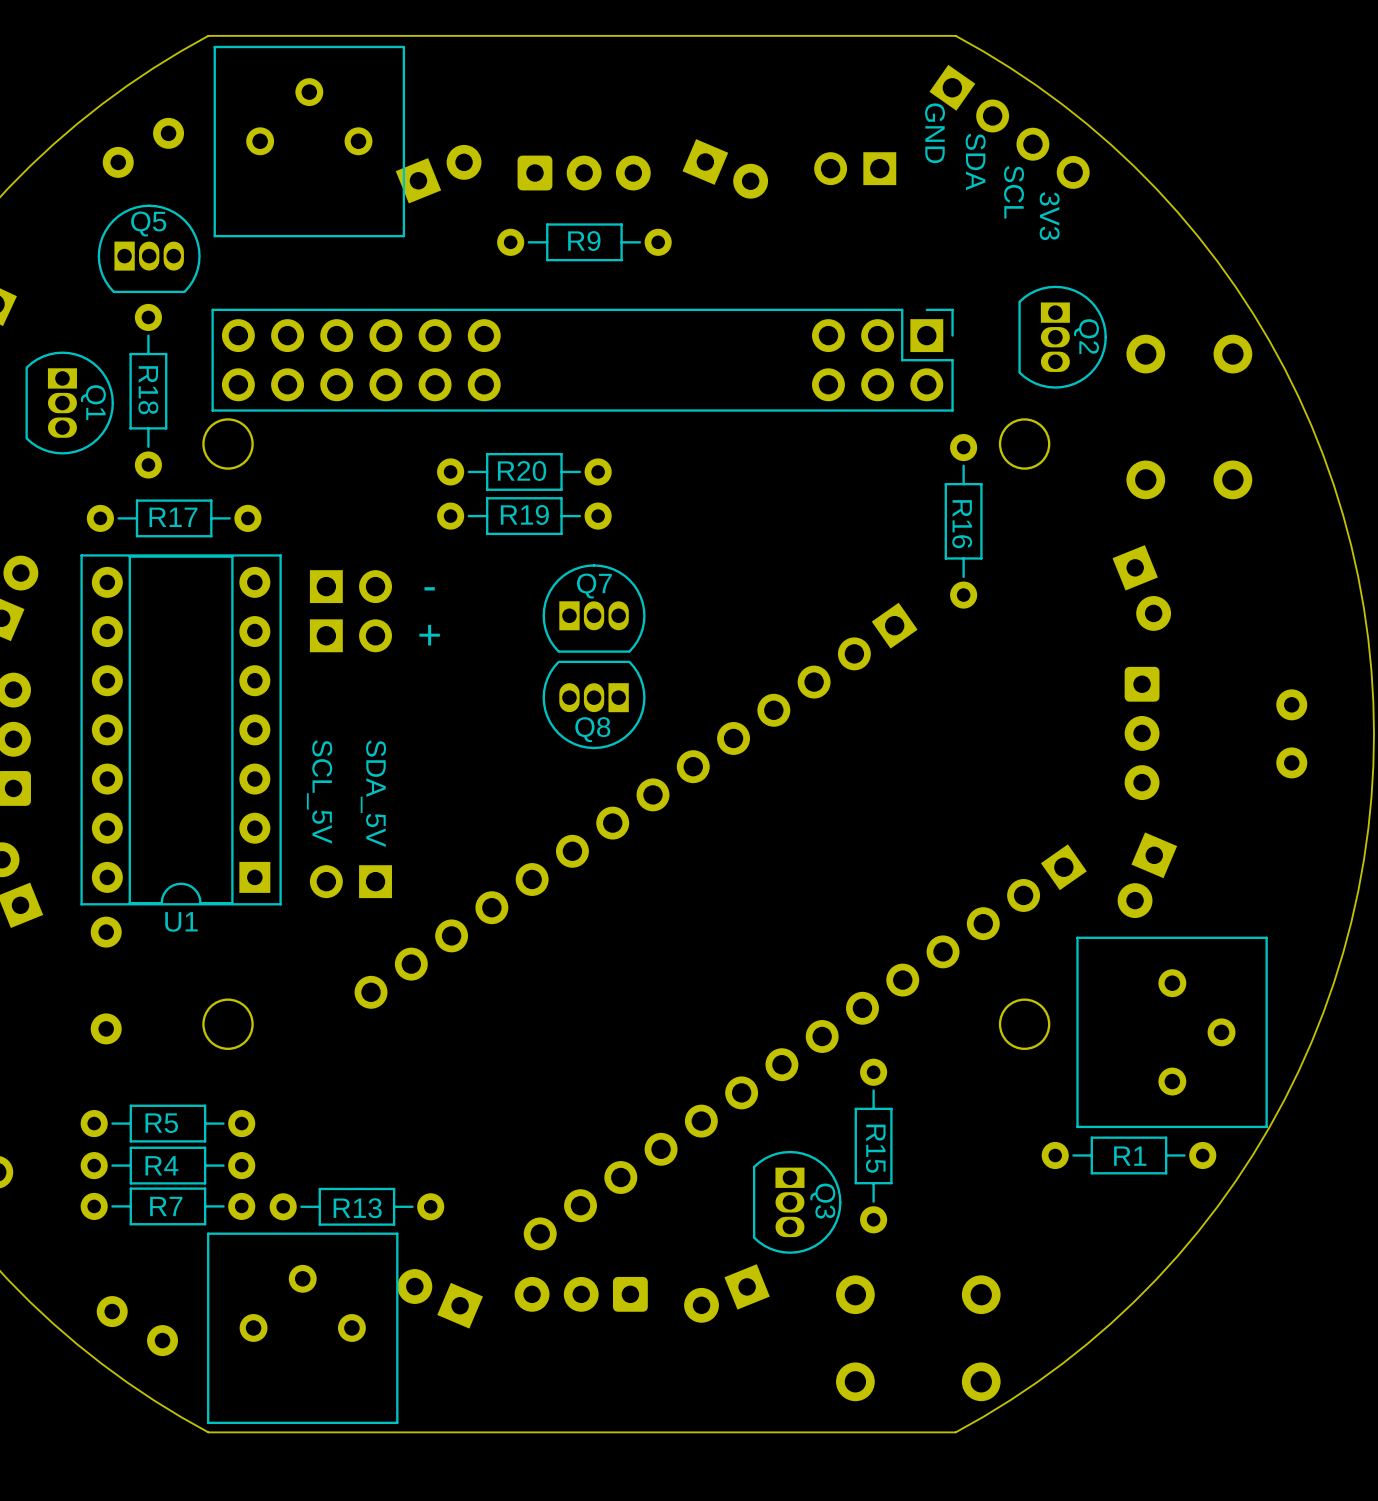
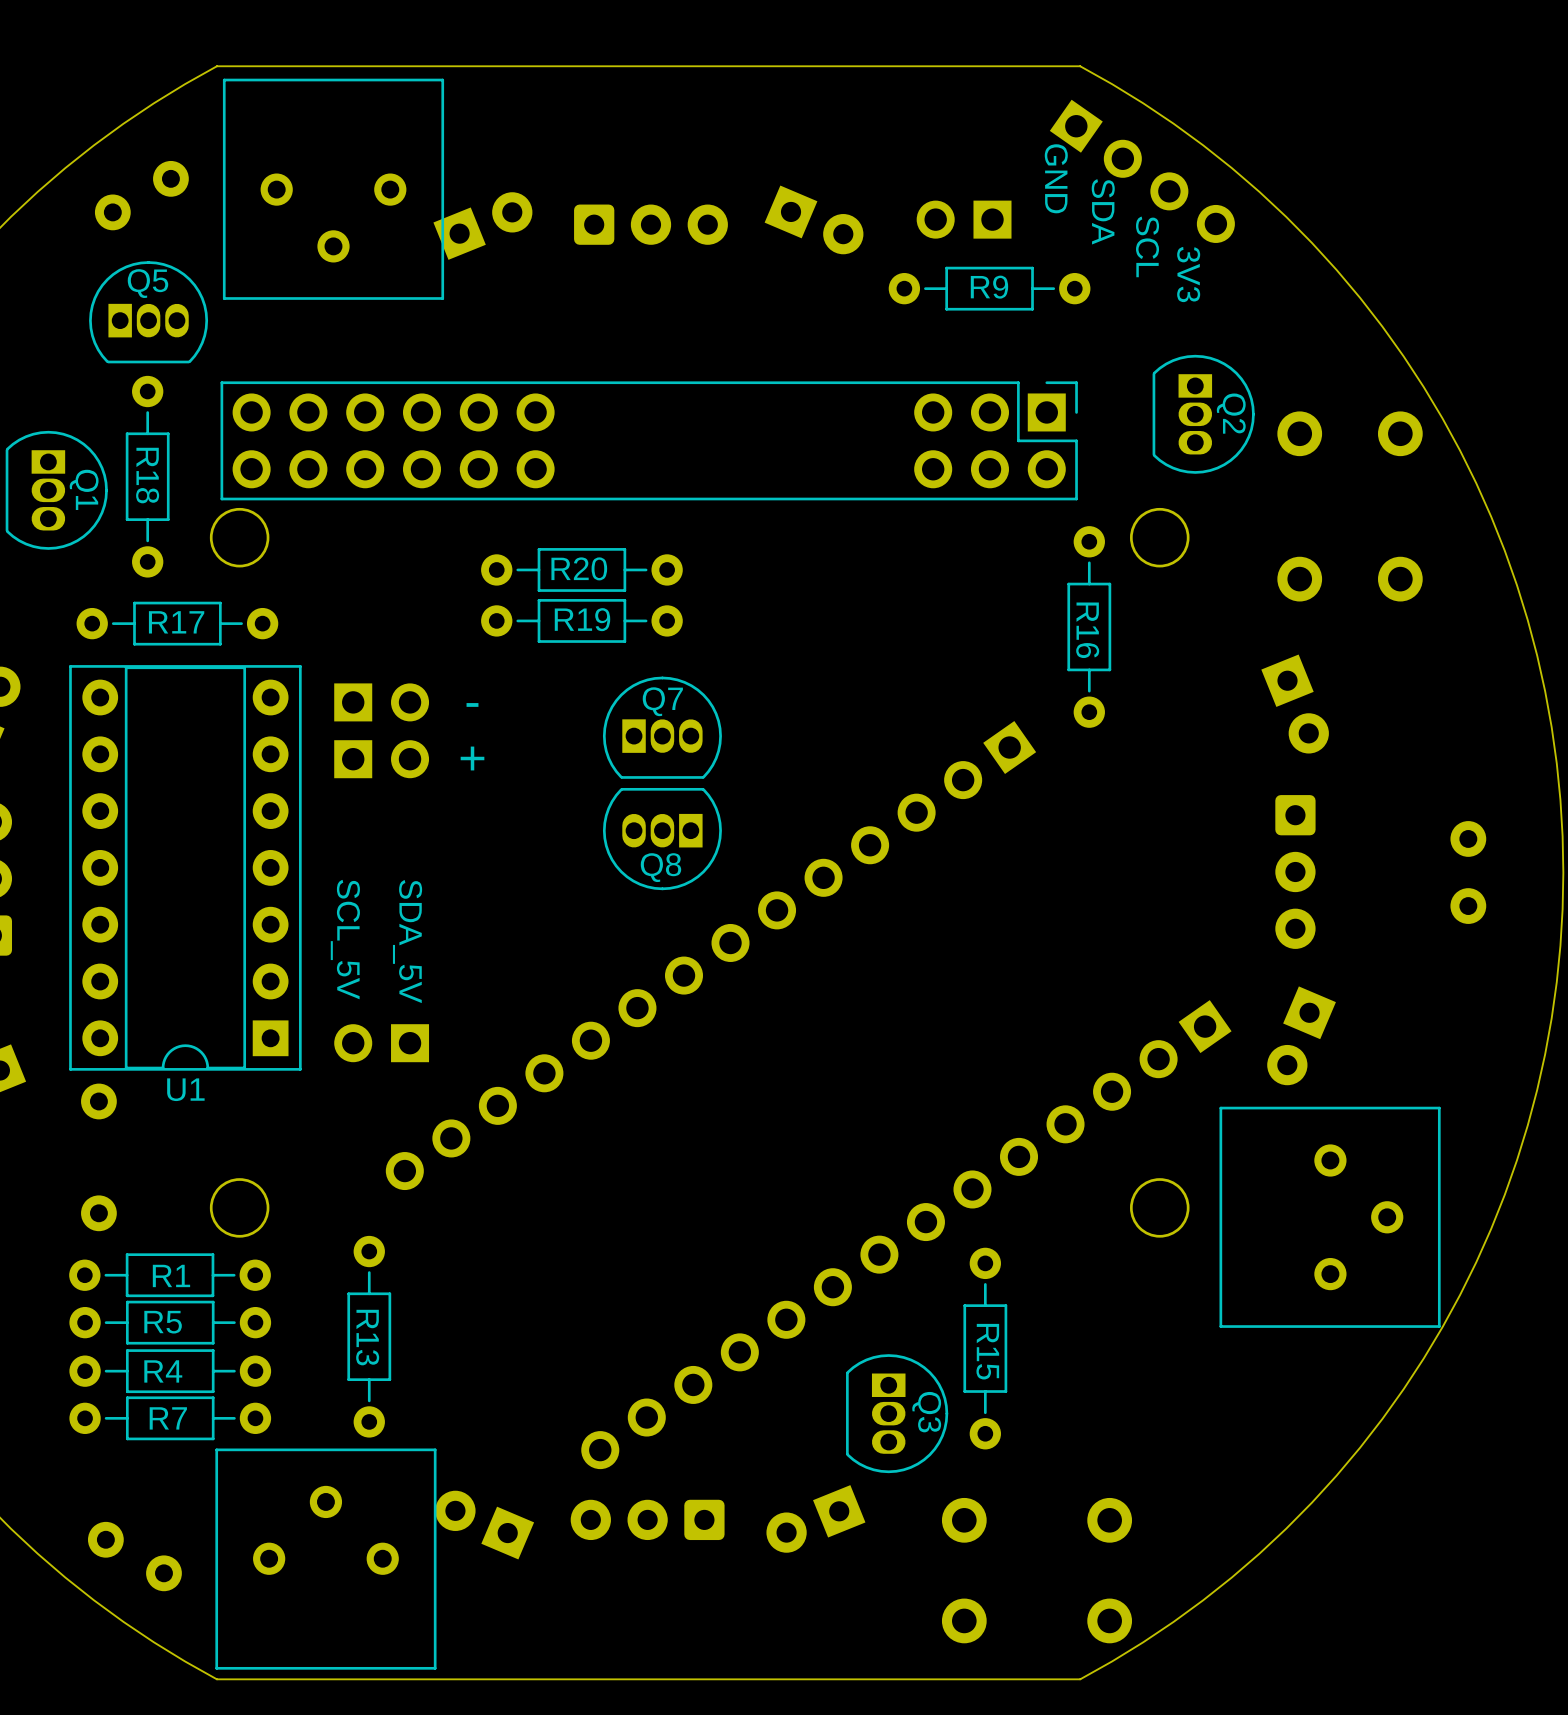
part rotation: 0° (309, 141) -> 180° (333, 189)
R9 position: (584, 242) -> (989, 288)
R1 position: (1128, 1155) -> (170, 1275)
R13 rotation: 0° (356, 1206) -> 90° clockwise (369, 1336)

